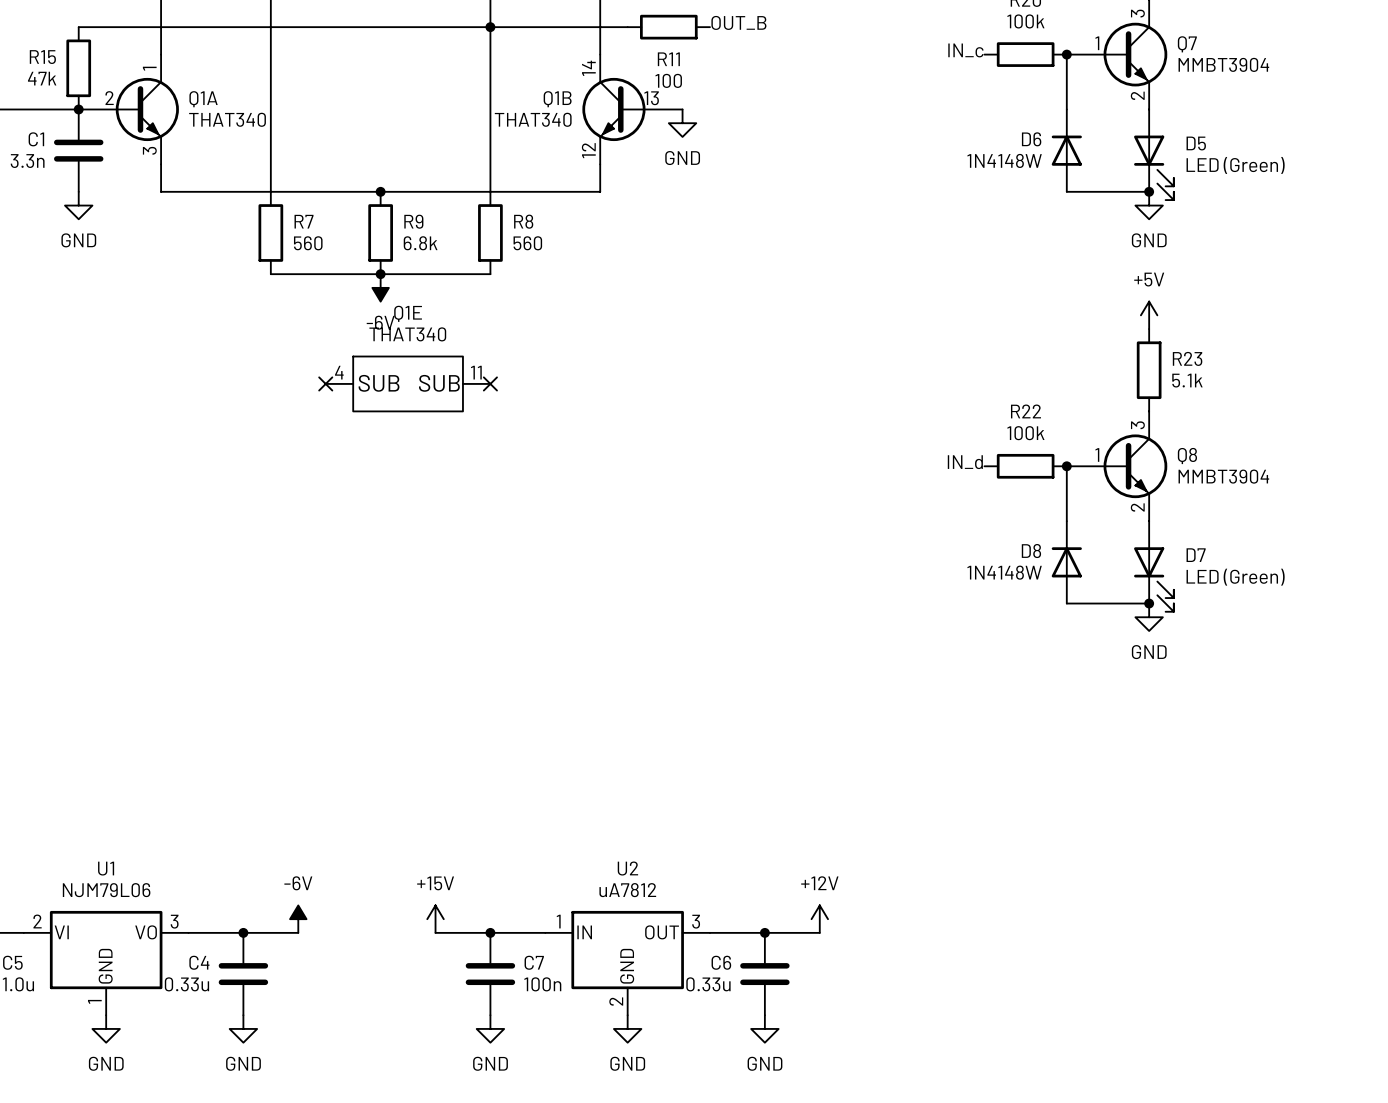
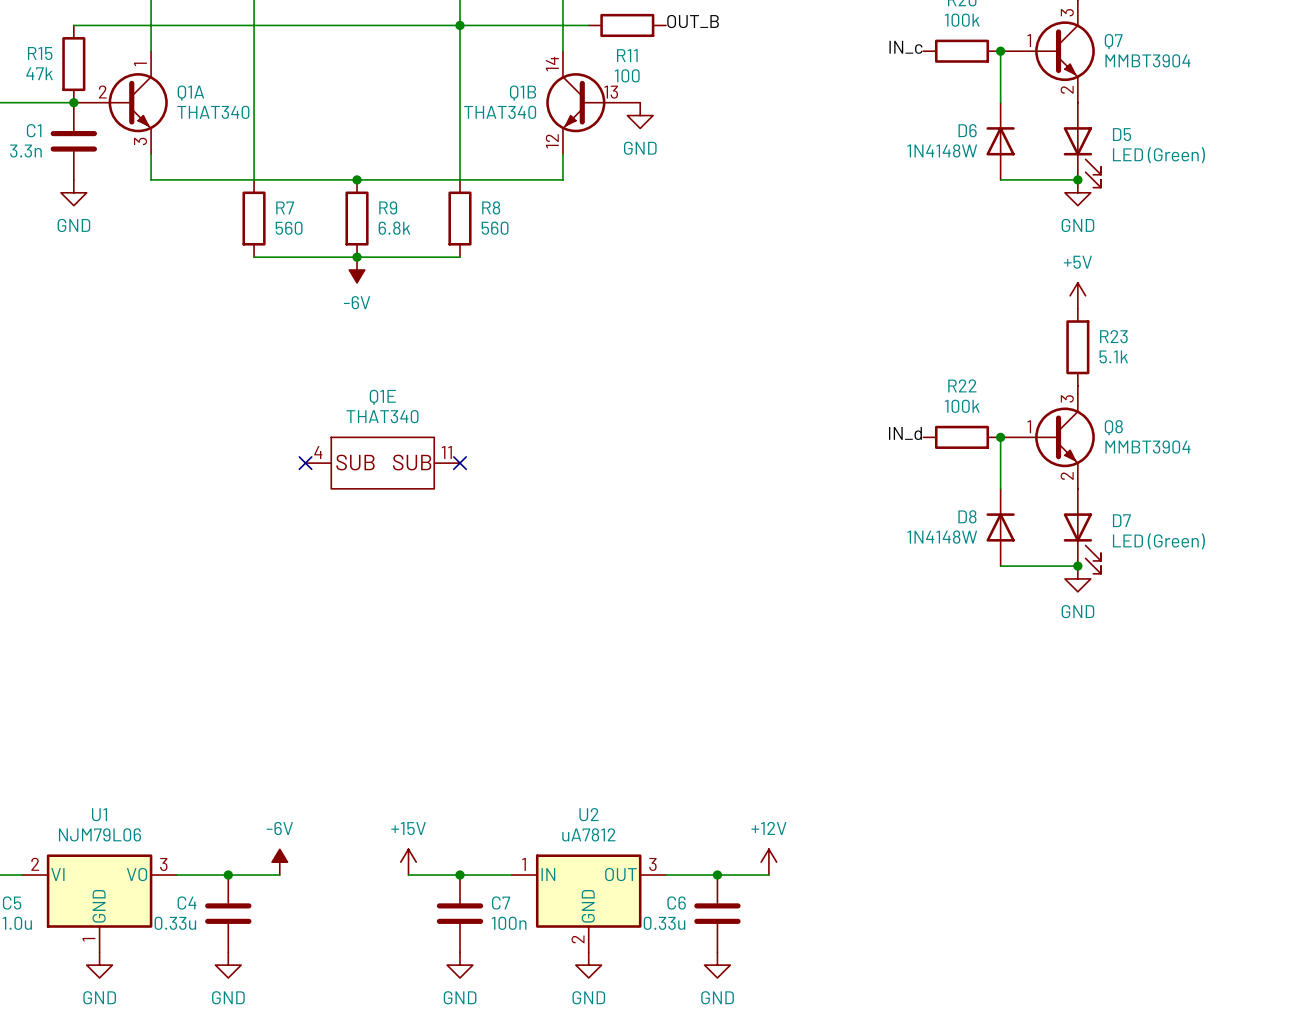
no-connect mark: (325, 383) -> none
Q1E position: (408, 383) -> (382, 463)
no-connect mark: (490, 383) -> none
no-connect mark: none -> (305, 463)
no-connect mark: none -> (459, 463)

